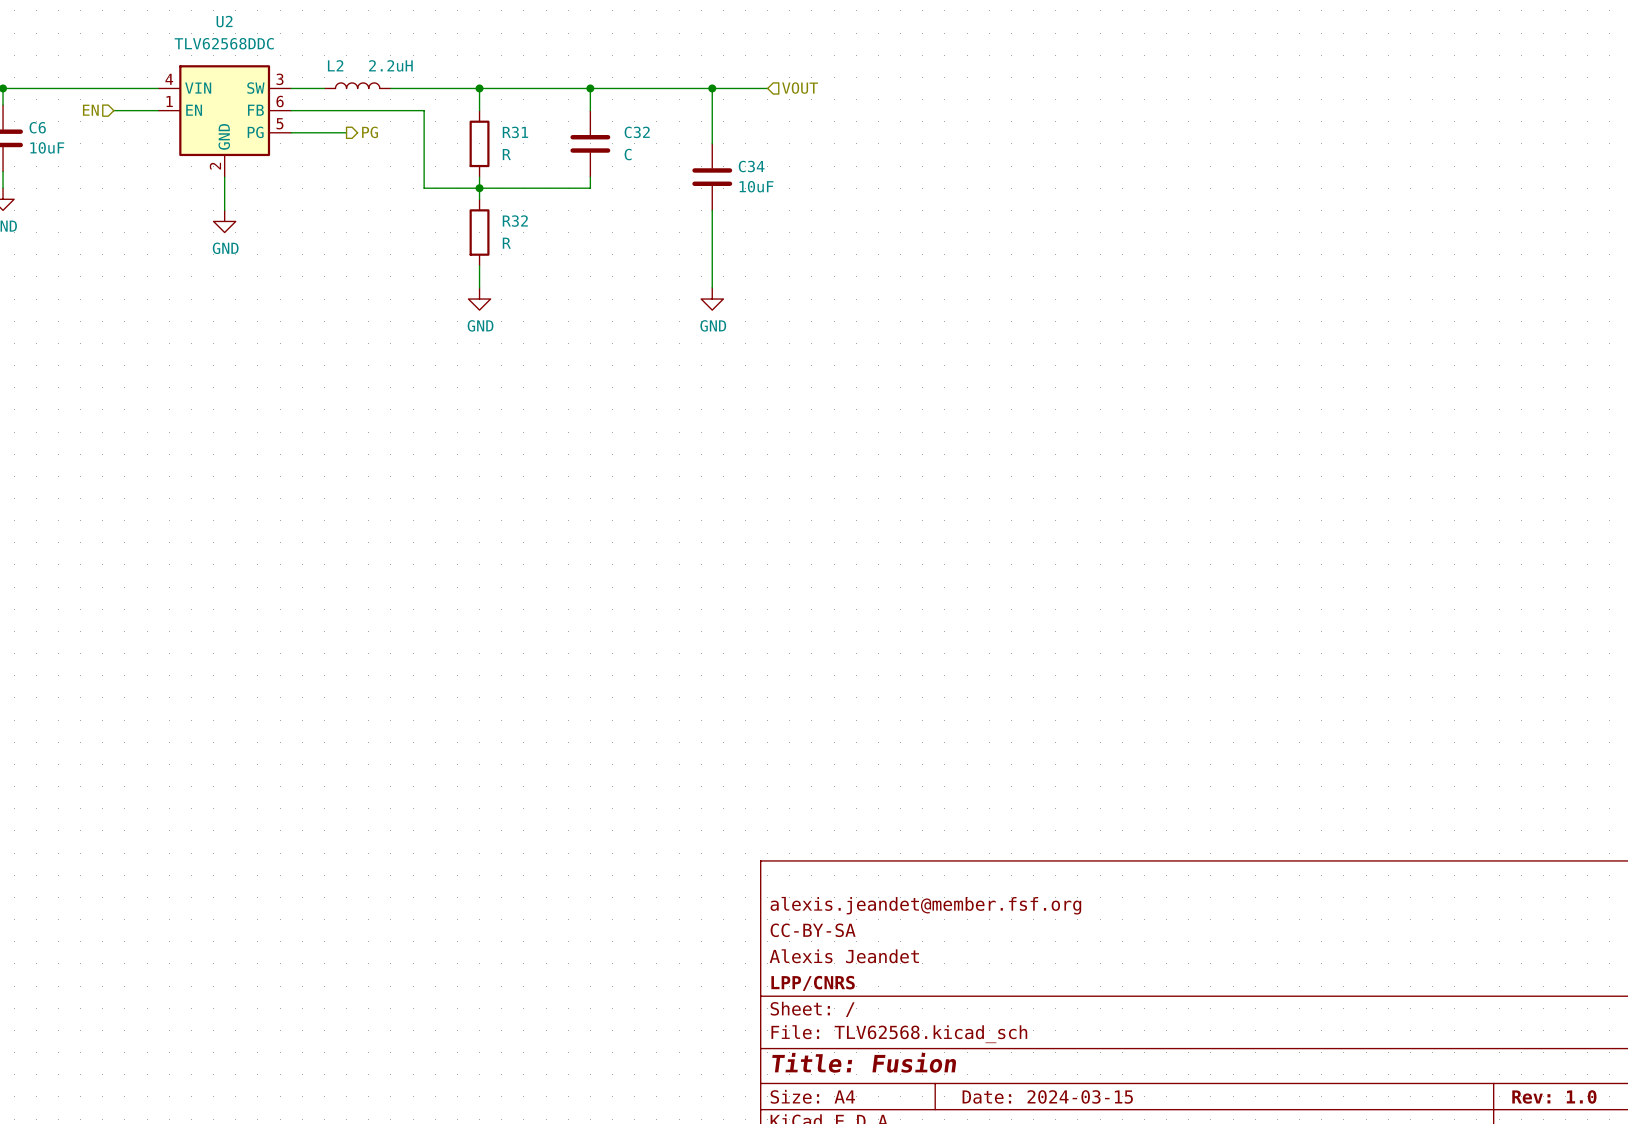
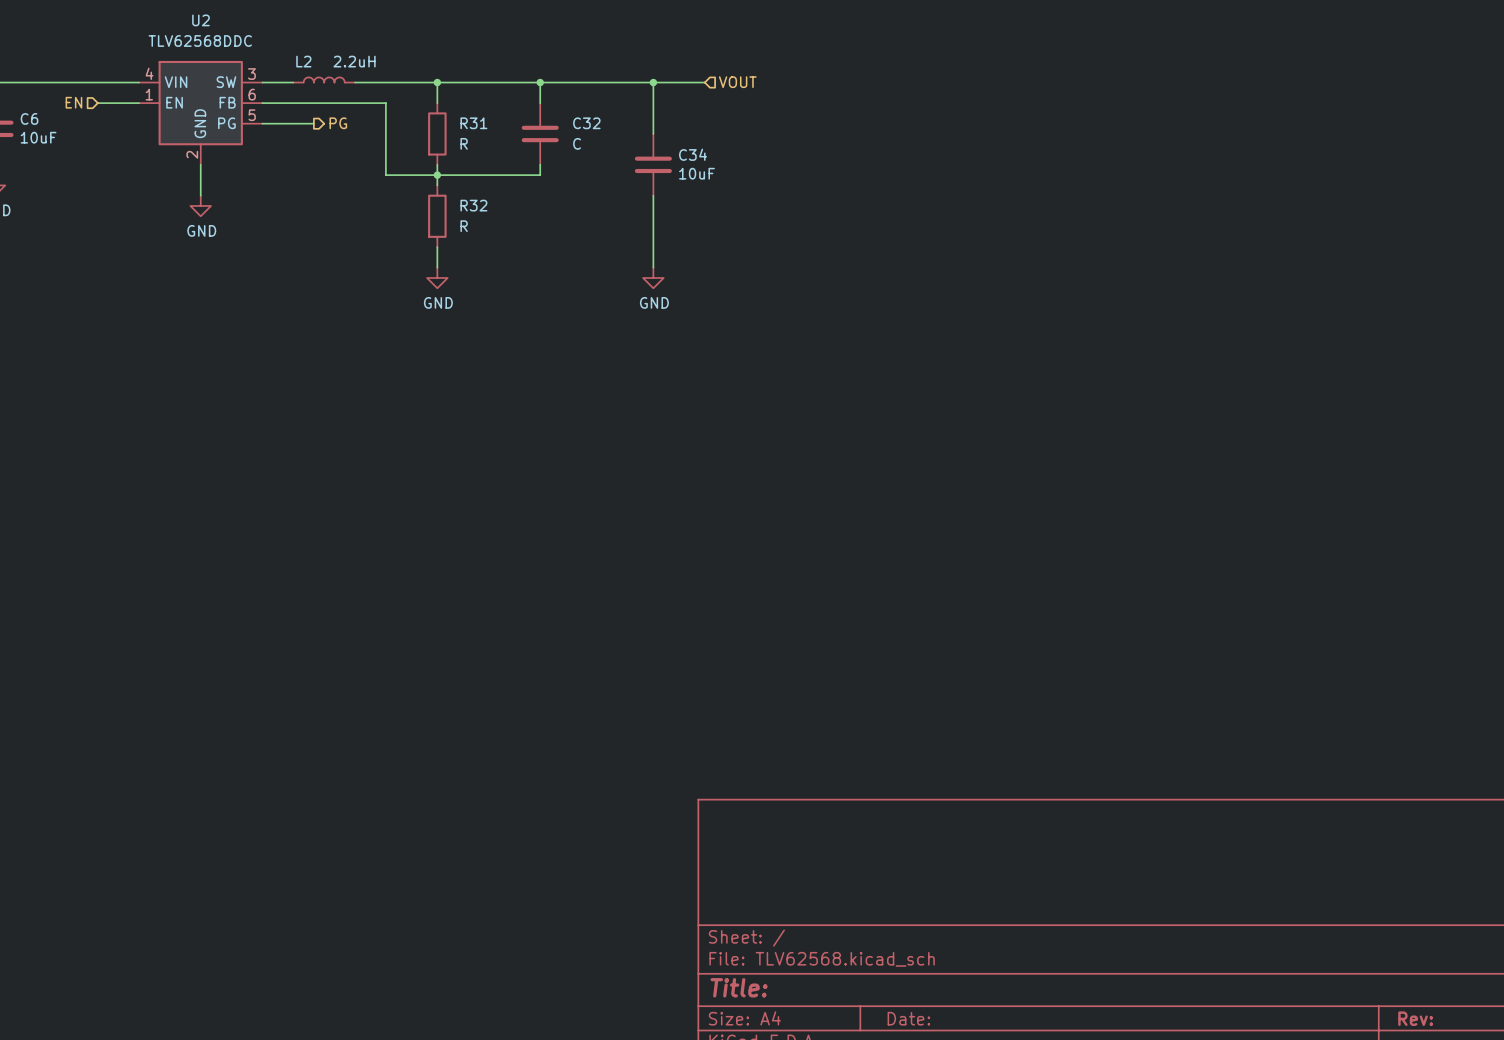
title block: alexis.jeandet@member.fsf.org (925, 905) -> none
title block: CC-BY-SA (813, 930) -> none
title block: Alexis Jeandet (844, 956) -> none
title block: LPP/CNRS (813, 983) -> none
title block: Title: Fusion (864, 1062) -> Title: (739, 987)
title block: Date: 2024-03-15 (1047, 1096) -> Date: (908, 1018)
title block: Rev: 1.0 (1554, 1096) -> Rev: (1415, 1018)

